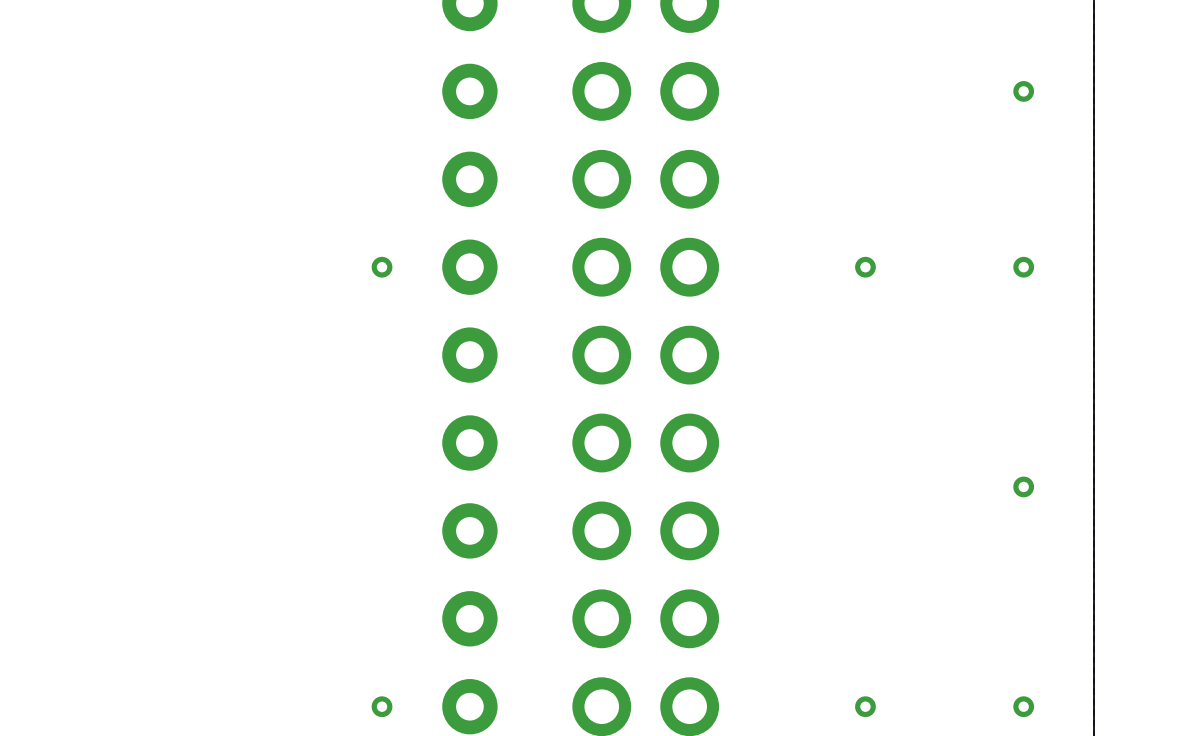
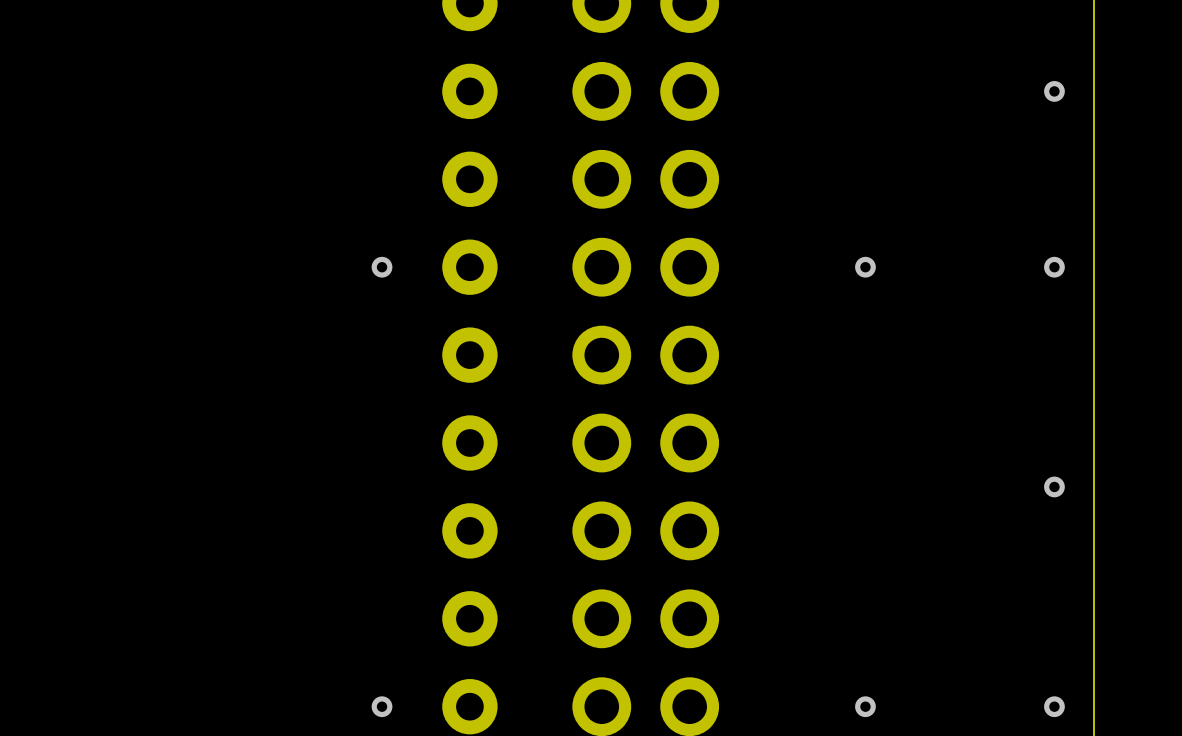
via position: (1023, 91) -> (1054, 91)
via position: (1023, 267) -> (1054, 267)
via position: (1023, 486) -> (1054, 486)
via position: (1023, 706) -> (1054, 706)

